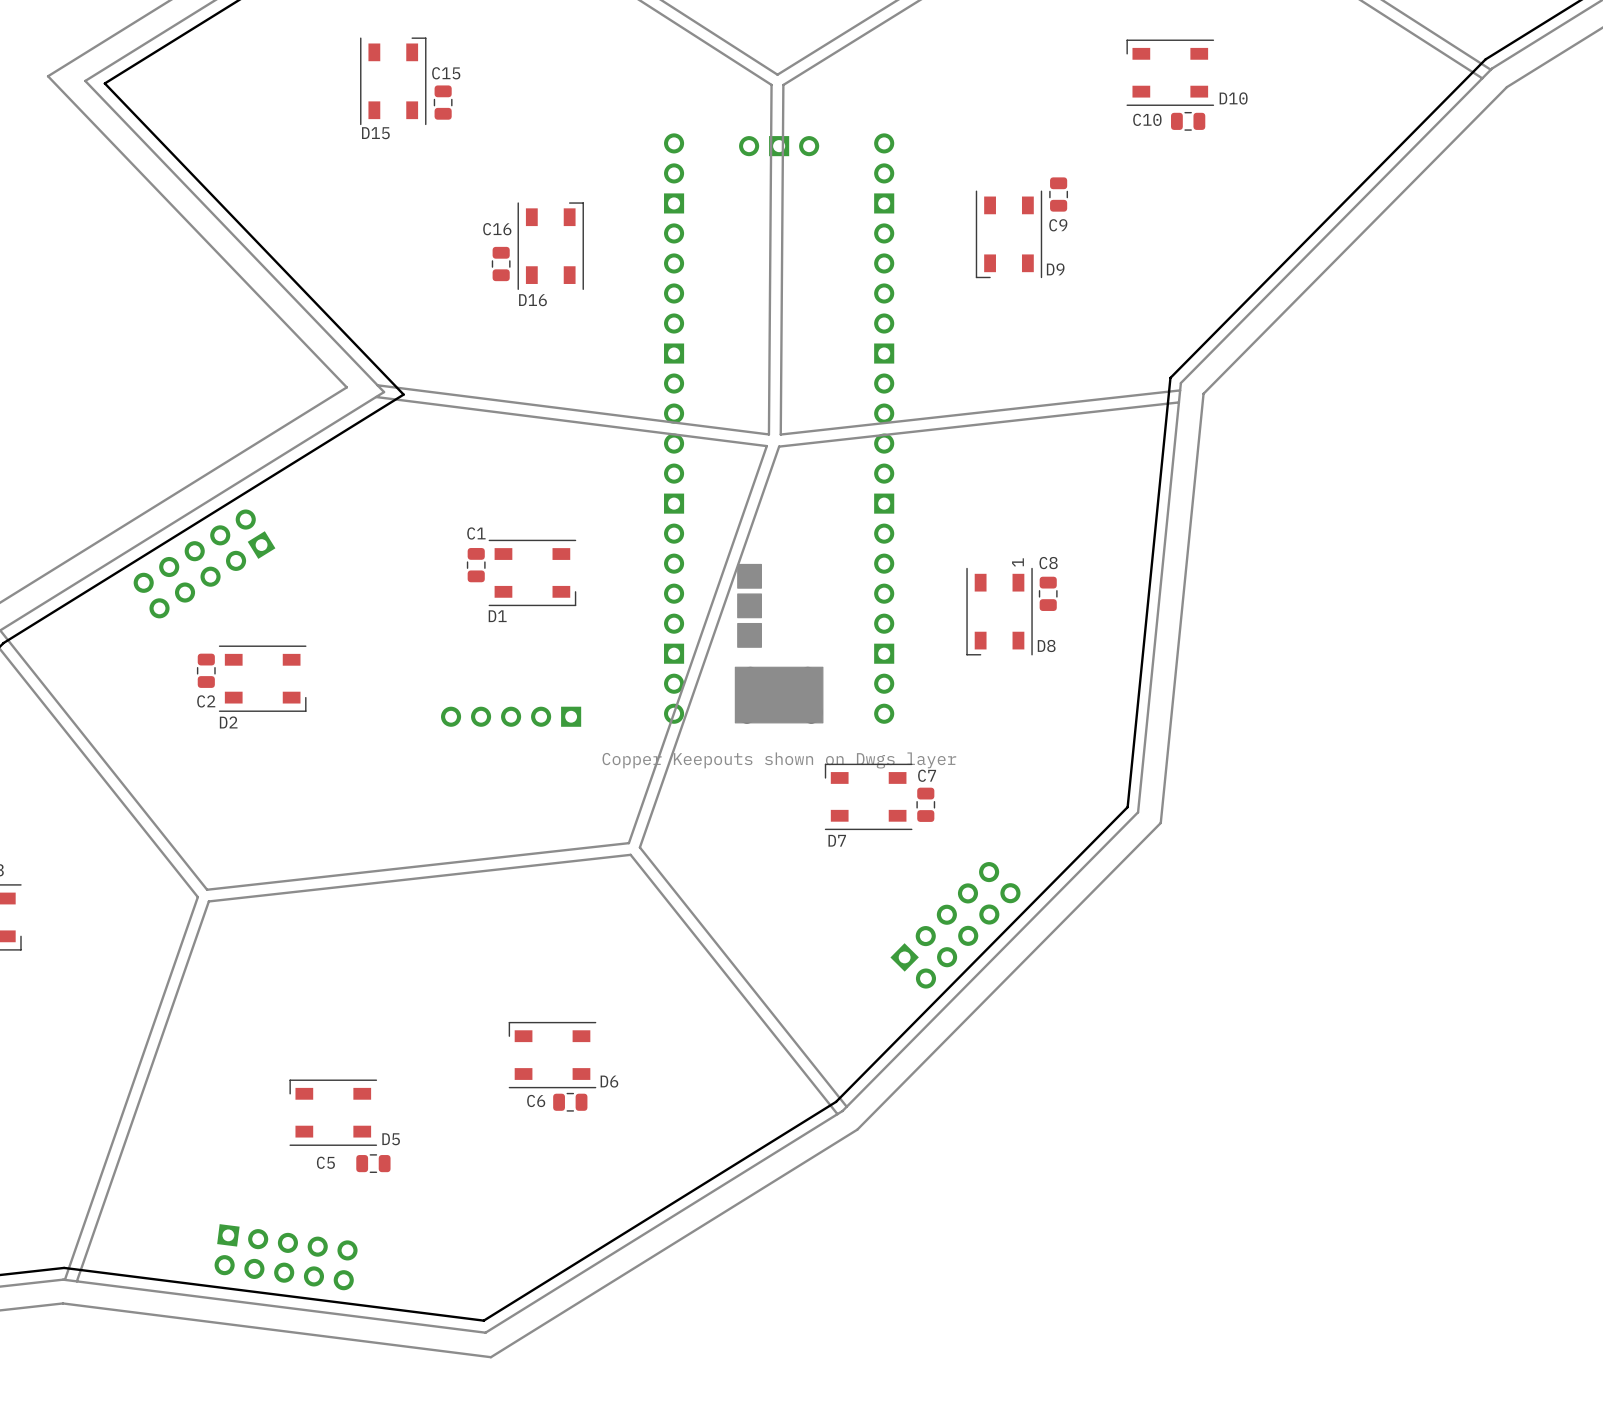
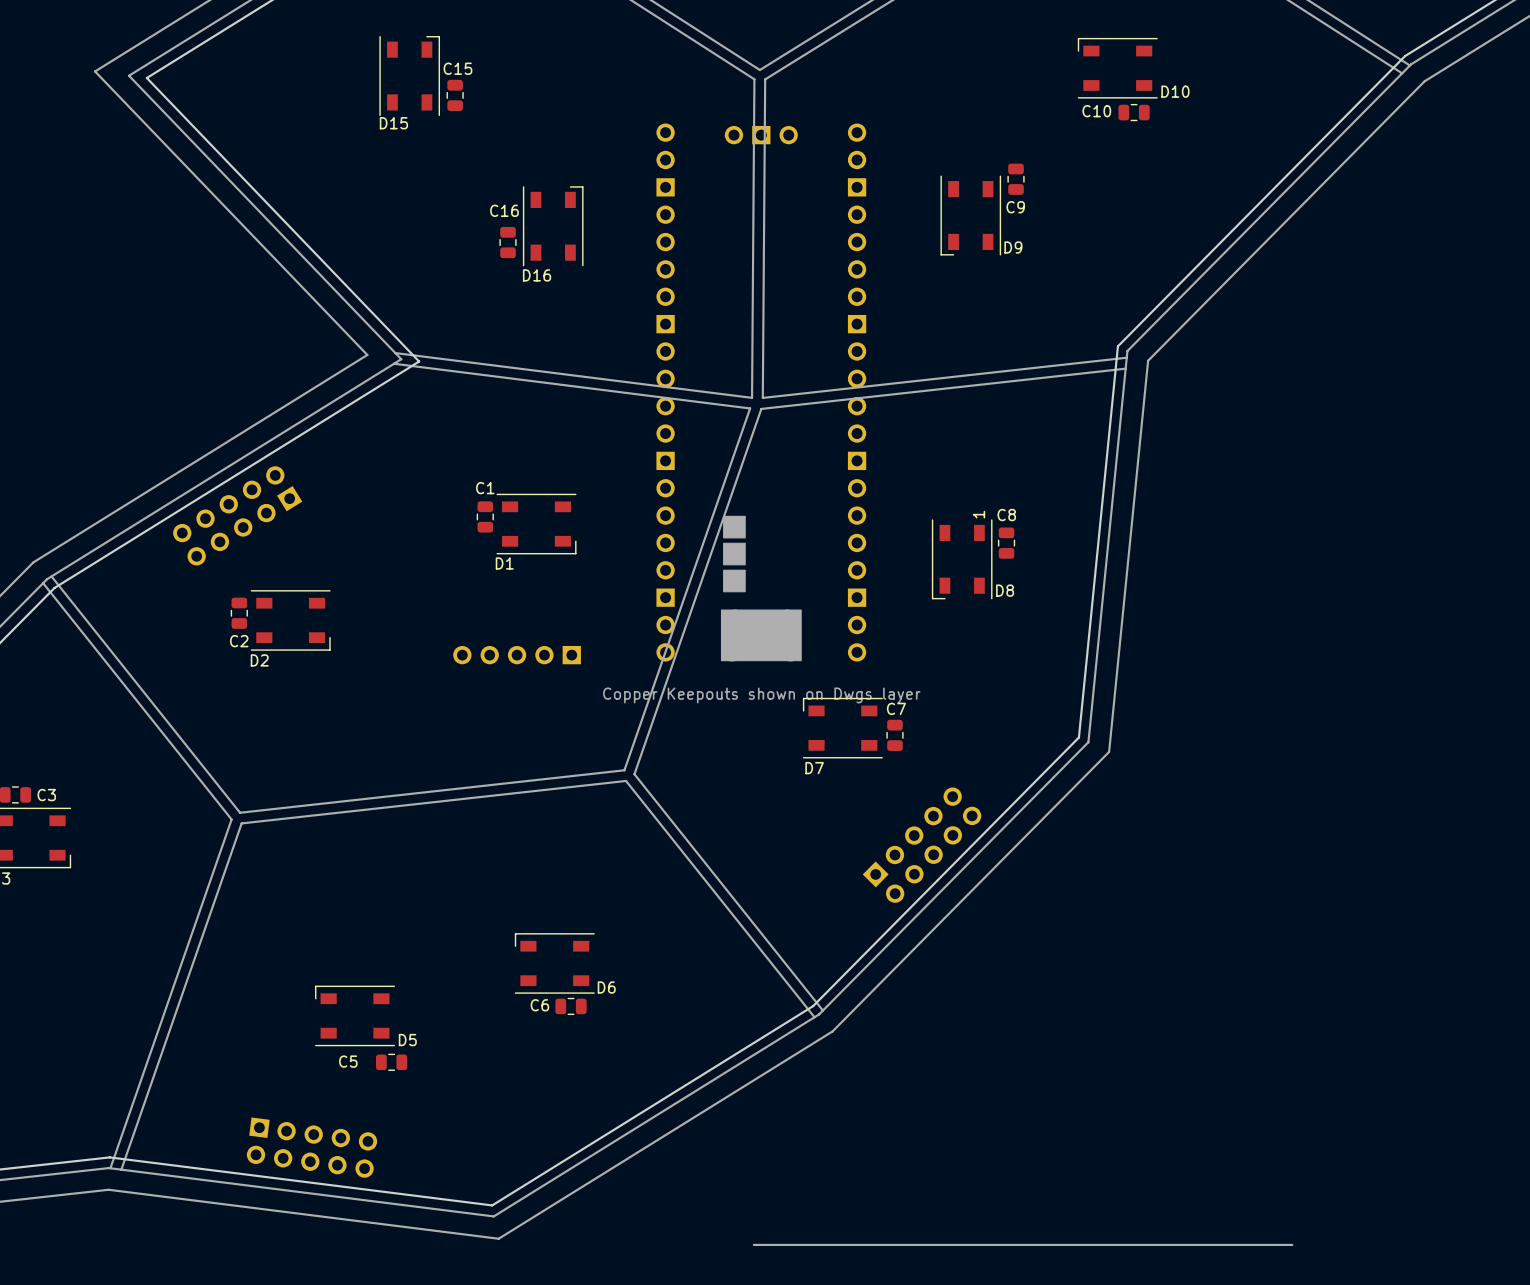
line: none -> (753, 1244) (1292, 1244)

